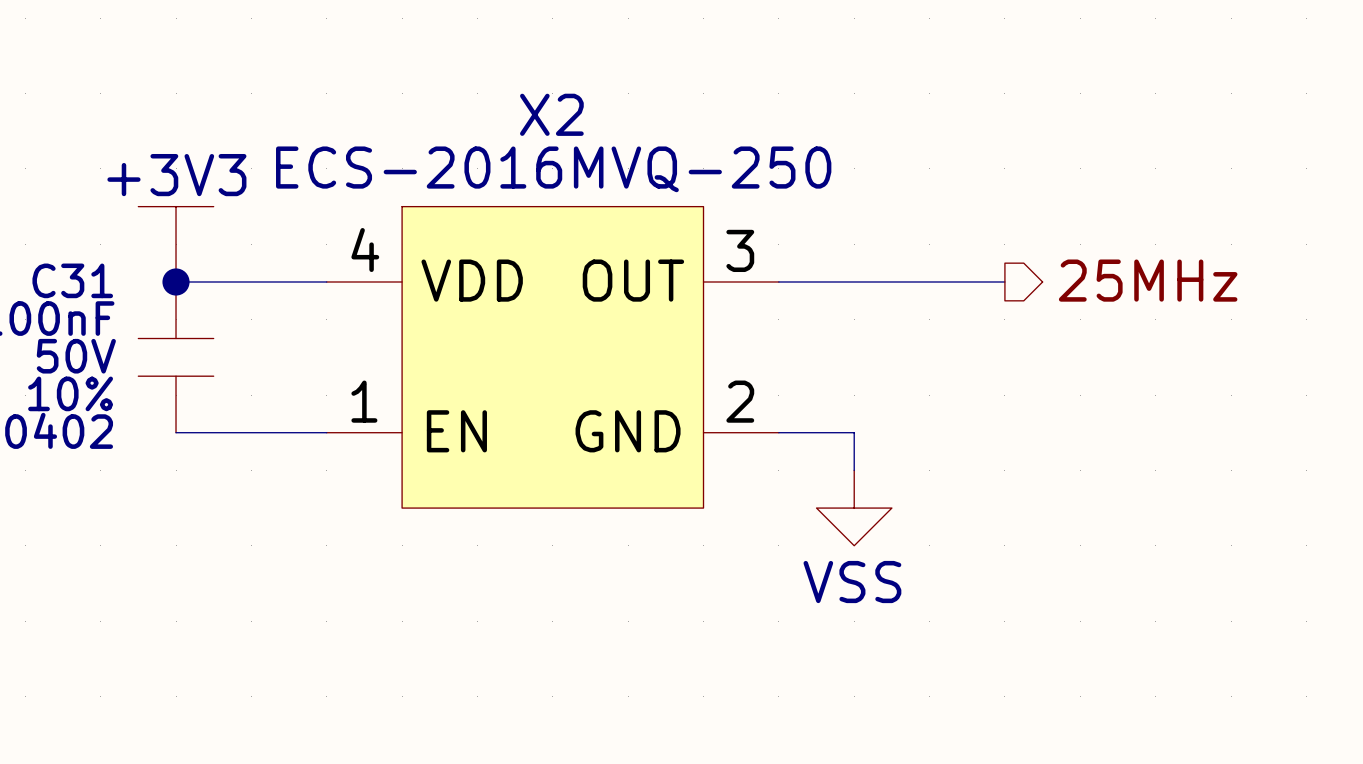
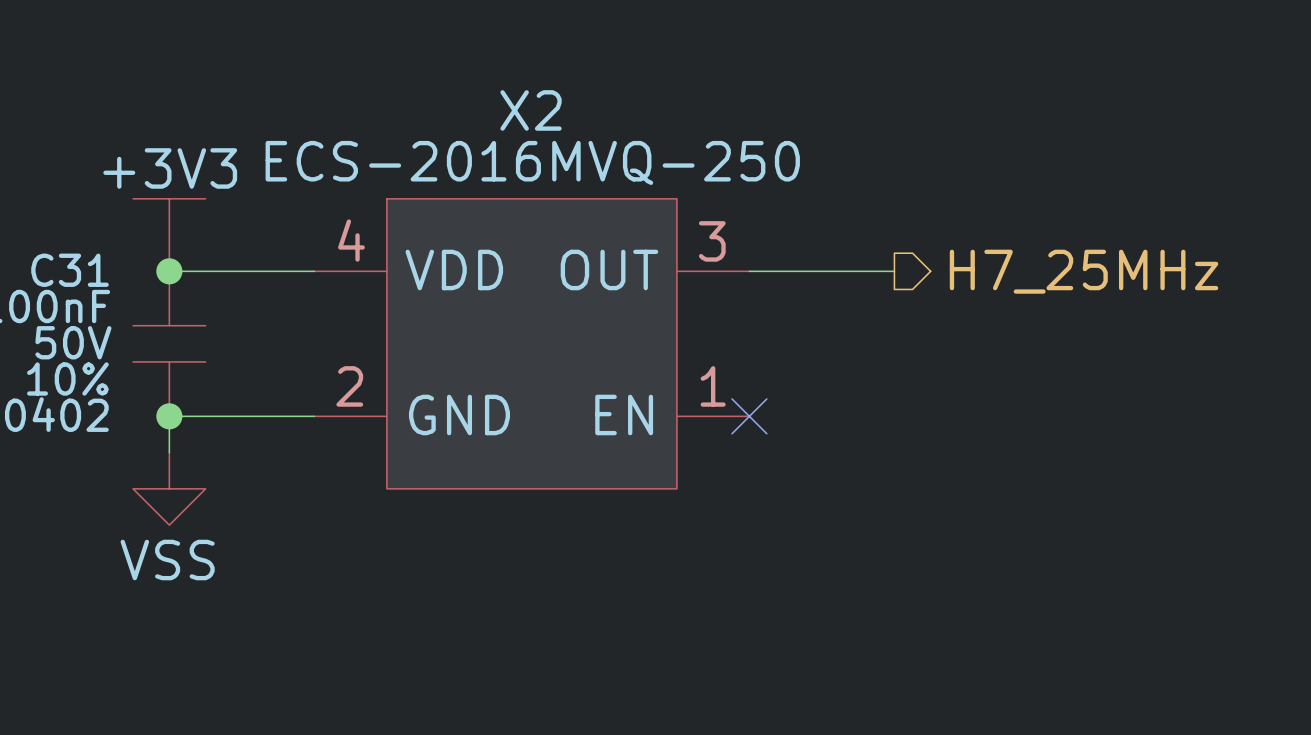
hierarchical label: 25MHz (1148, 280) -> H7_25MHz (1084, 271)
wire: (929, 281) (1004, 281) -> none
X2 pin number: 1 (364, 401) -> 2 (349, 386)
X2 pin number: 2 (740, 401) -> 1 (713, 386)
X2 pin name: EN (456, 431) -> GND (459, 414)
X2 pin name: GND (628, 431) -> EN (624, 414)
wire: none -> (169, 416) (169, 452)
junction: none -> (169, 416)
wire: (778, 432) (854, 432) (854, 470) -> none
no-connect mark: none -> (749, 416)
power symbol position: VSS (854, 508) -> VSS (169, 488)

